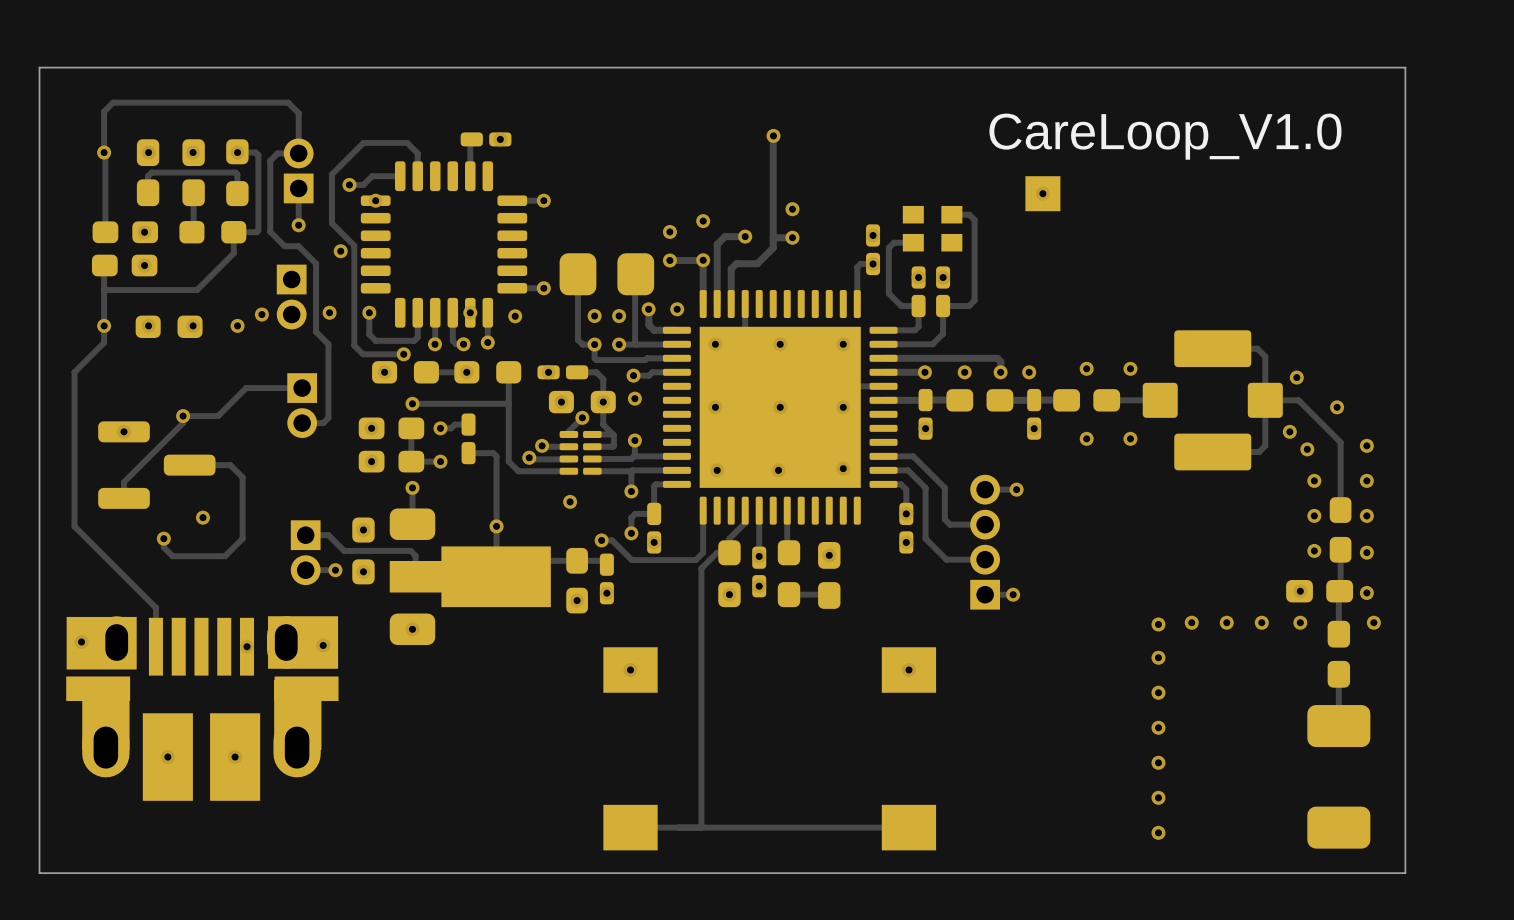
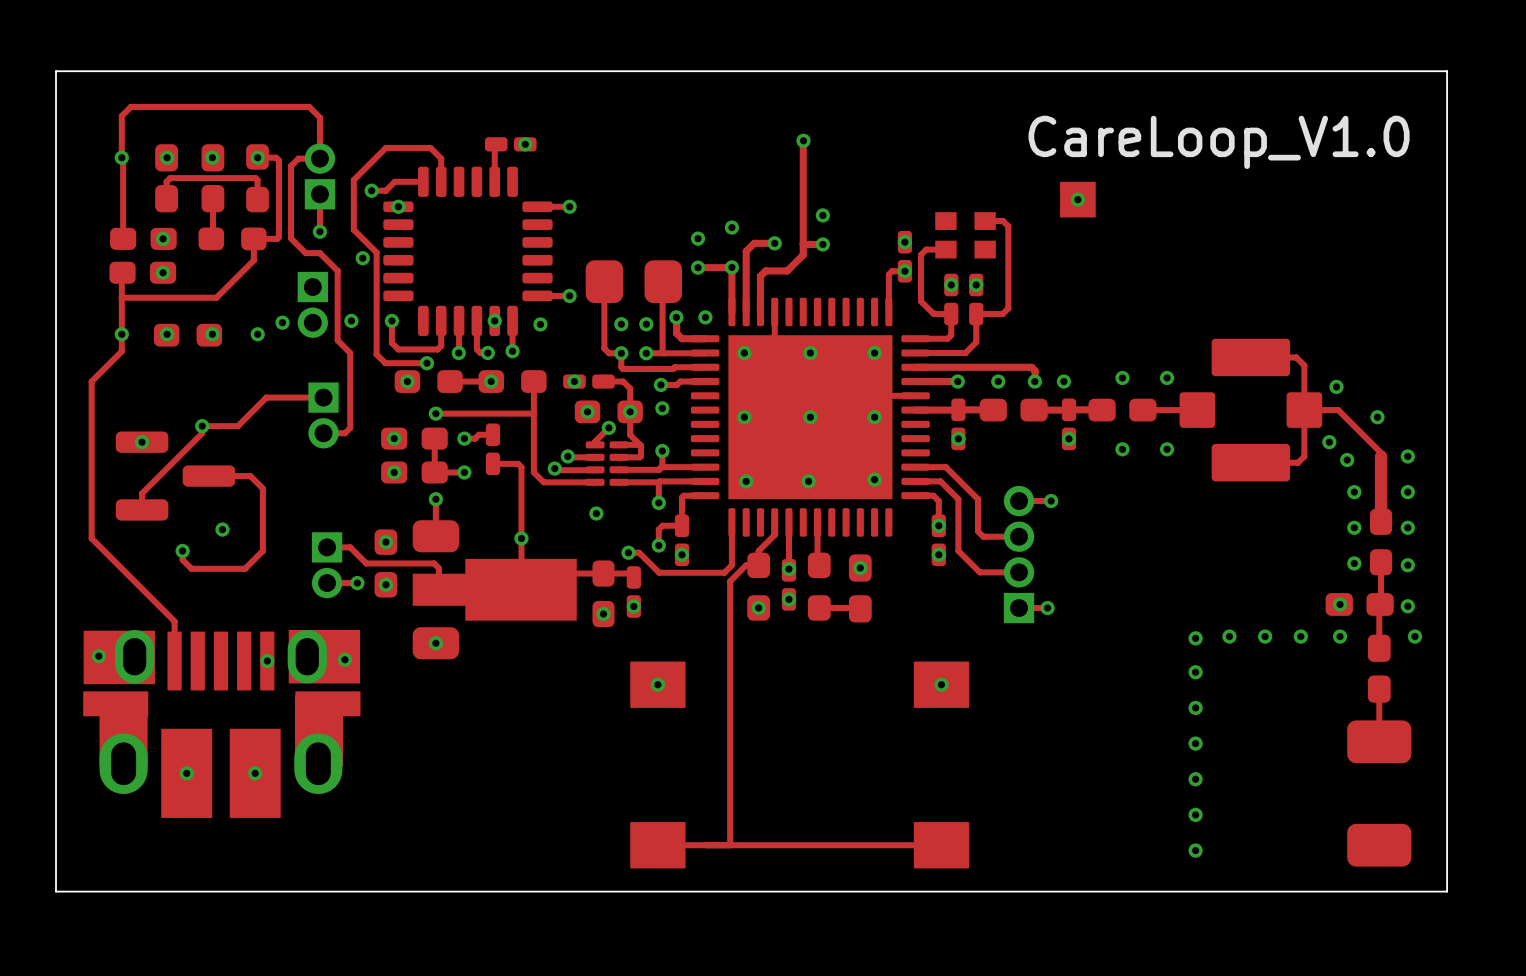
track width: thin (1340, 445) (1340, 510) -> thick (1381, 456) (1381, 521)

